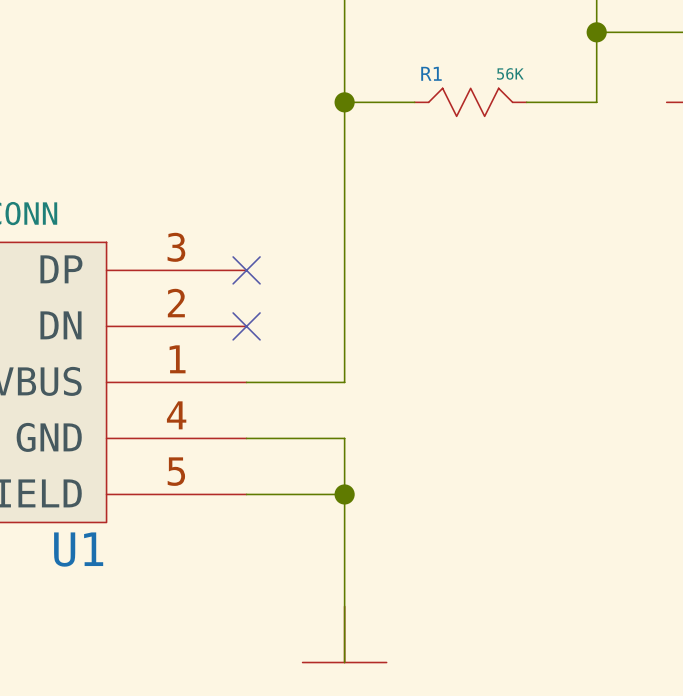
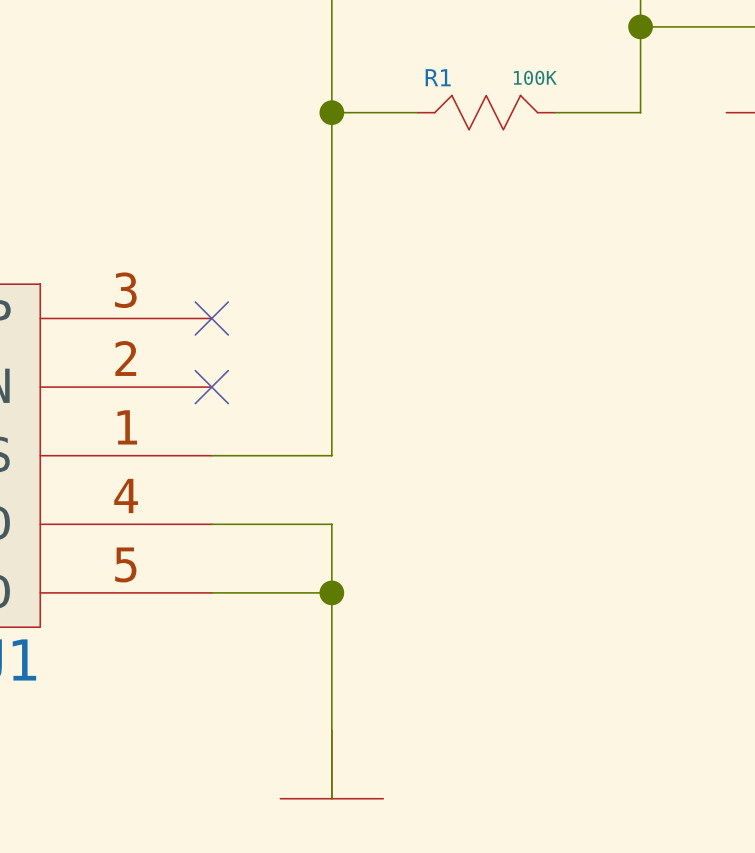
R1 value: 56K (510, 73) -> 100K (535, 77)

